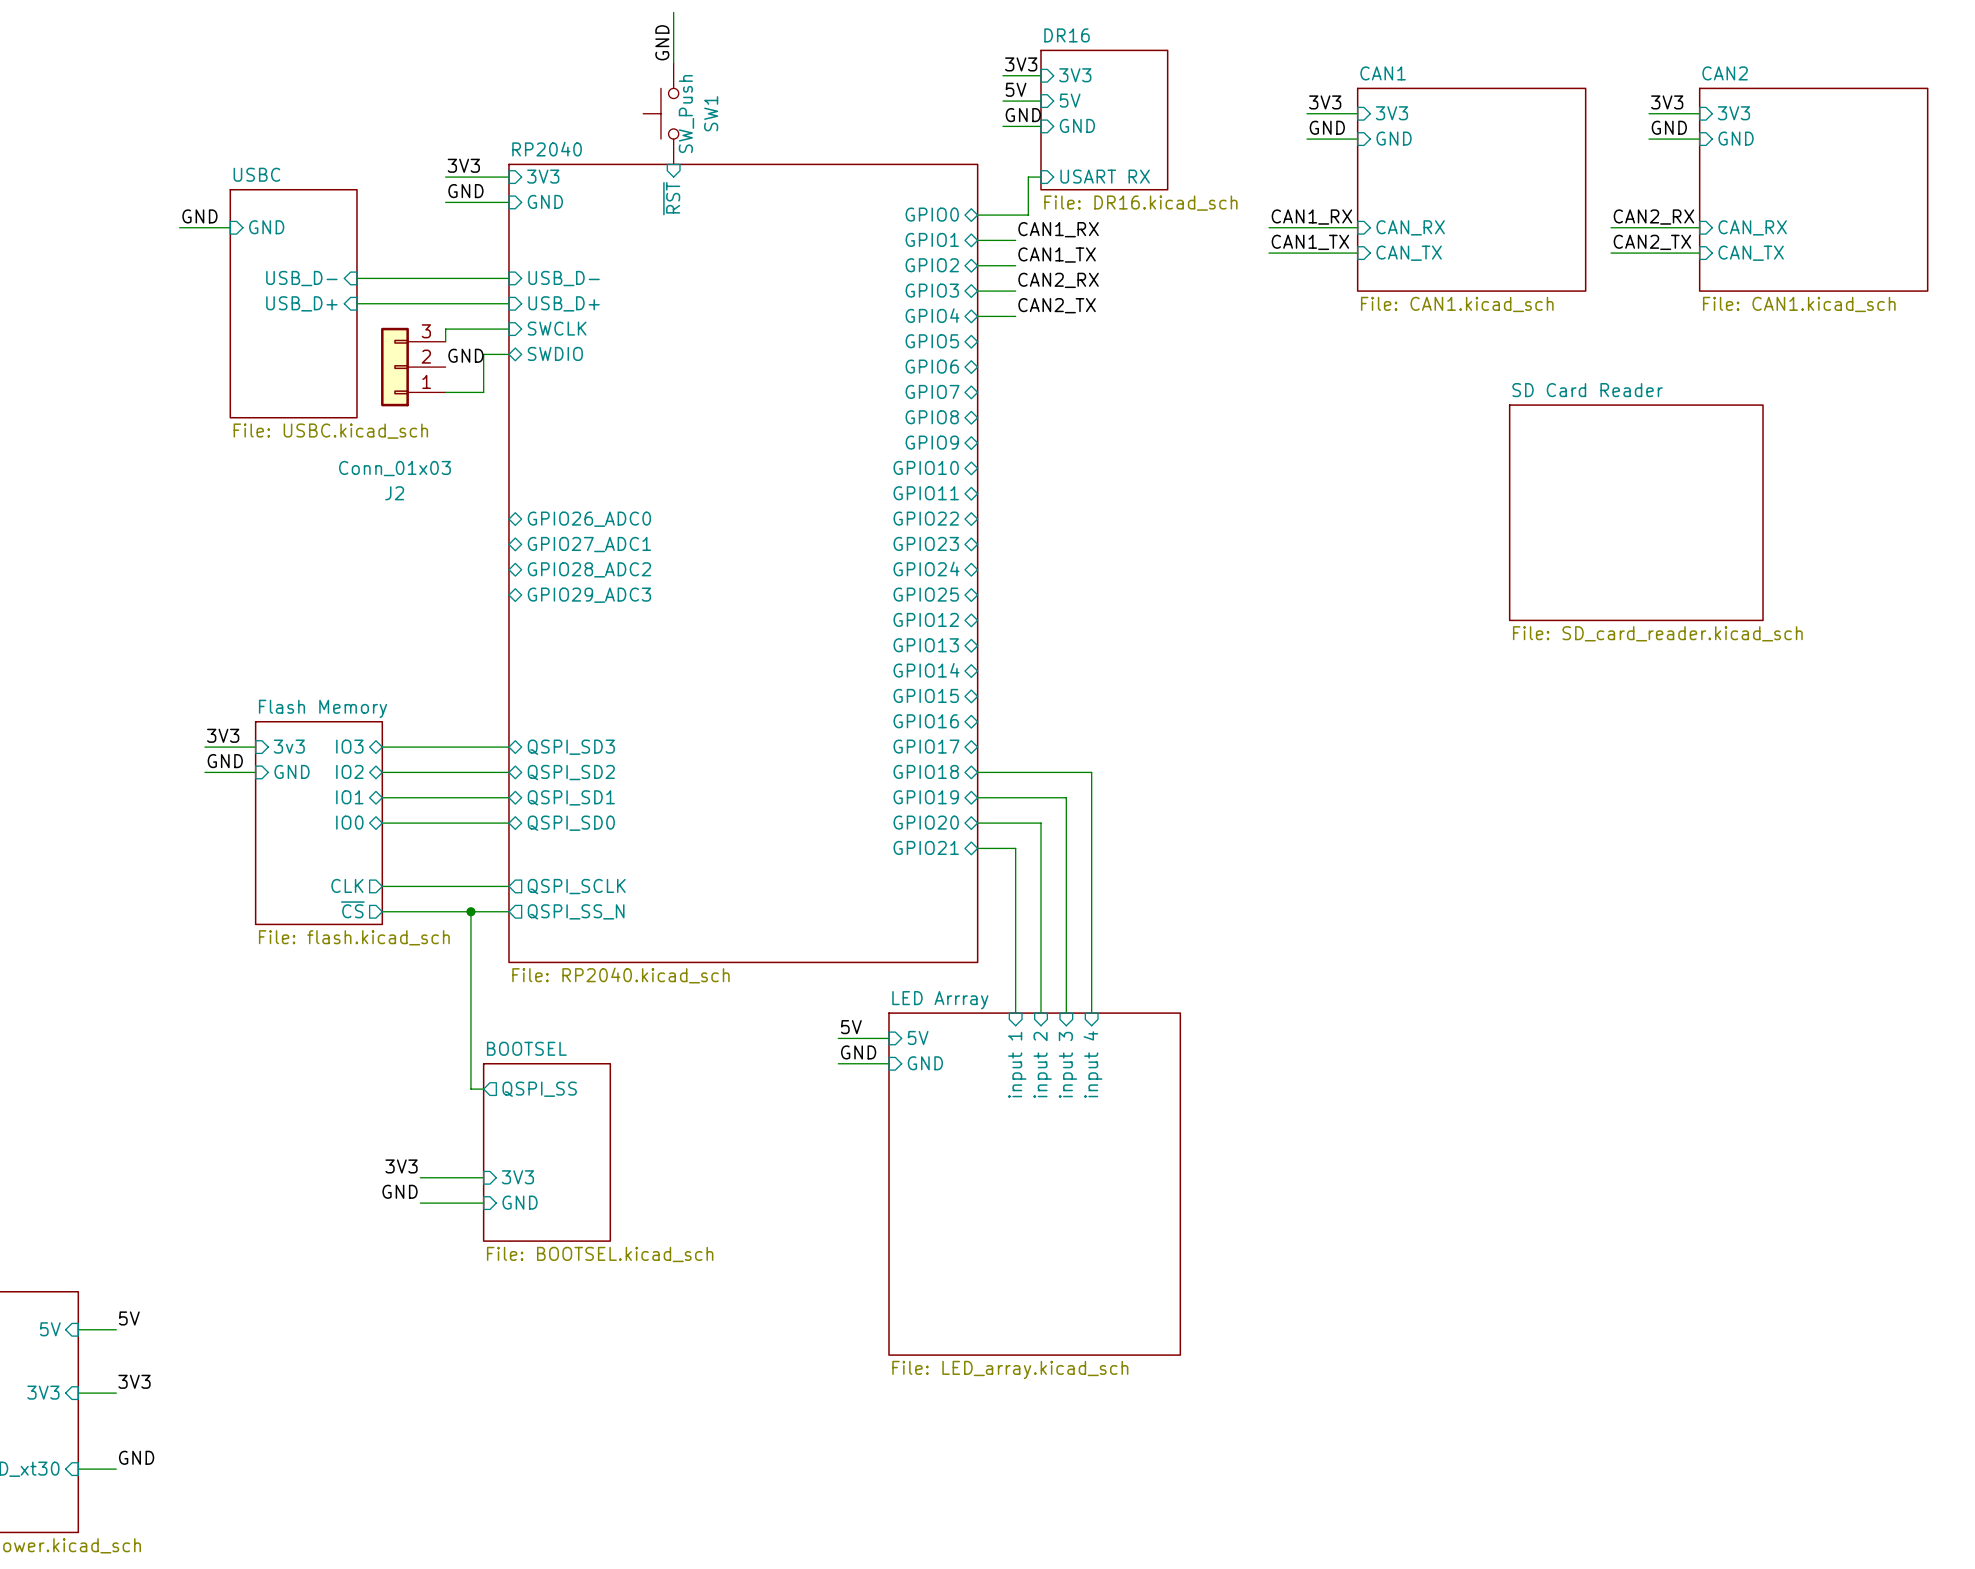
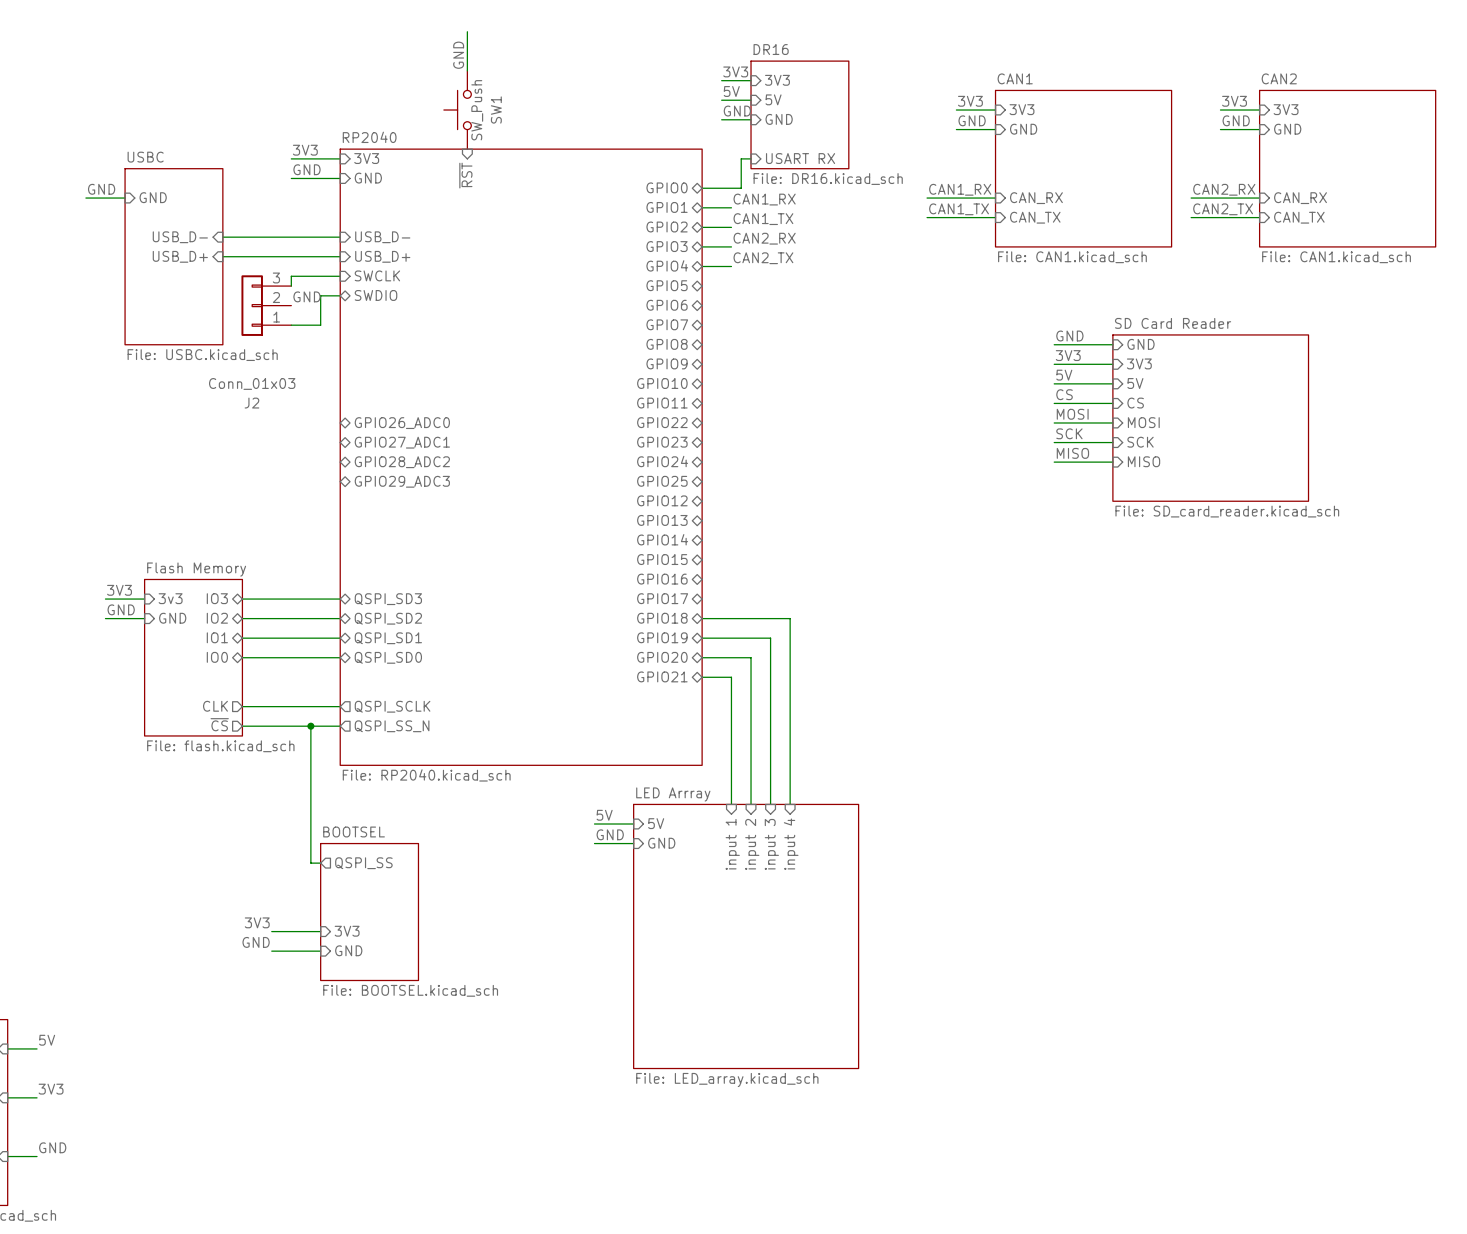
label: none -> GND (1069, 336)
wire: none -> (1054, 344) (1112, 344)
sheet pin: none -> GND (1141, 344)
label: none -> 3V3 (1068, 355)
sheet pin: none -> 3V3 (1139, 363)
wire: none -> (1054, 364) (1112, 364)
label: none -> 5V (1064, 375)
sheet pin: none -> 5V (1135, 383)
wire: none -> (1054, 383) (1112, 383)
label: none -> CS (1064, 394)
wire: none -> (1054, 403) (1112, 403)
sheet pin: none -> CS (1135, 403)
label: none -> MOSI (1072, 414)
sheet pin: none -> MOSI (1143, 422)
wire: none -> (1054, 422) (1112, 422)
label: none -> SCK (1069, 433)
sheet pin: none -> SCK (1140, 442)
wire: none -> (1054, 442) (1112, 442)
label: none -> MISO (1072, 453)
wire: none -> (1054, 462) (1112, 462)
sheet pin: none -> MISO (1144, 461)

